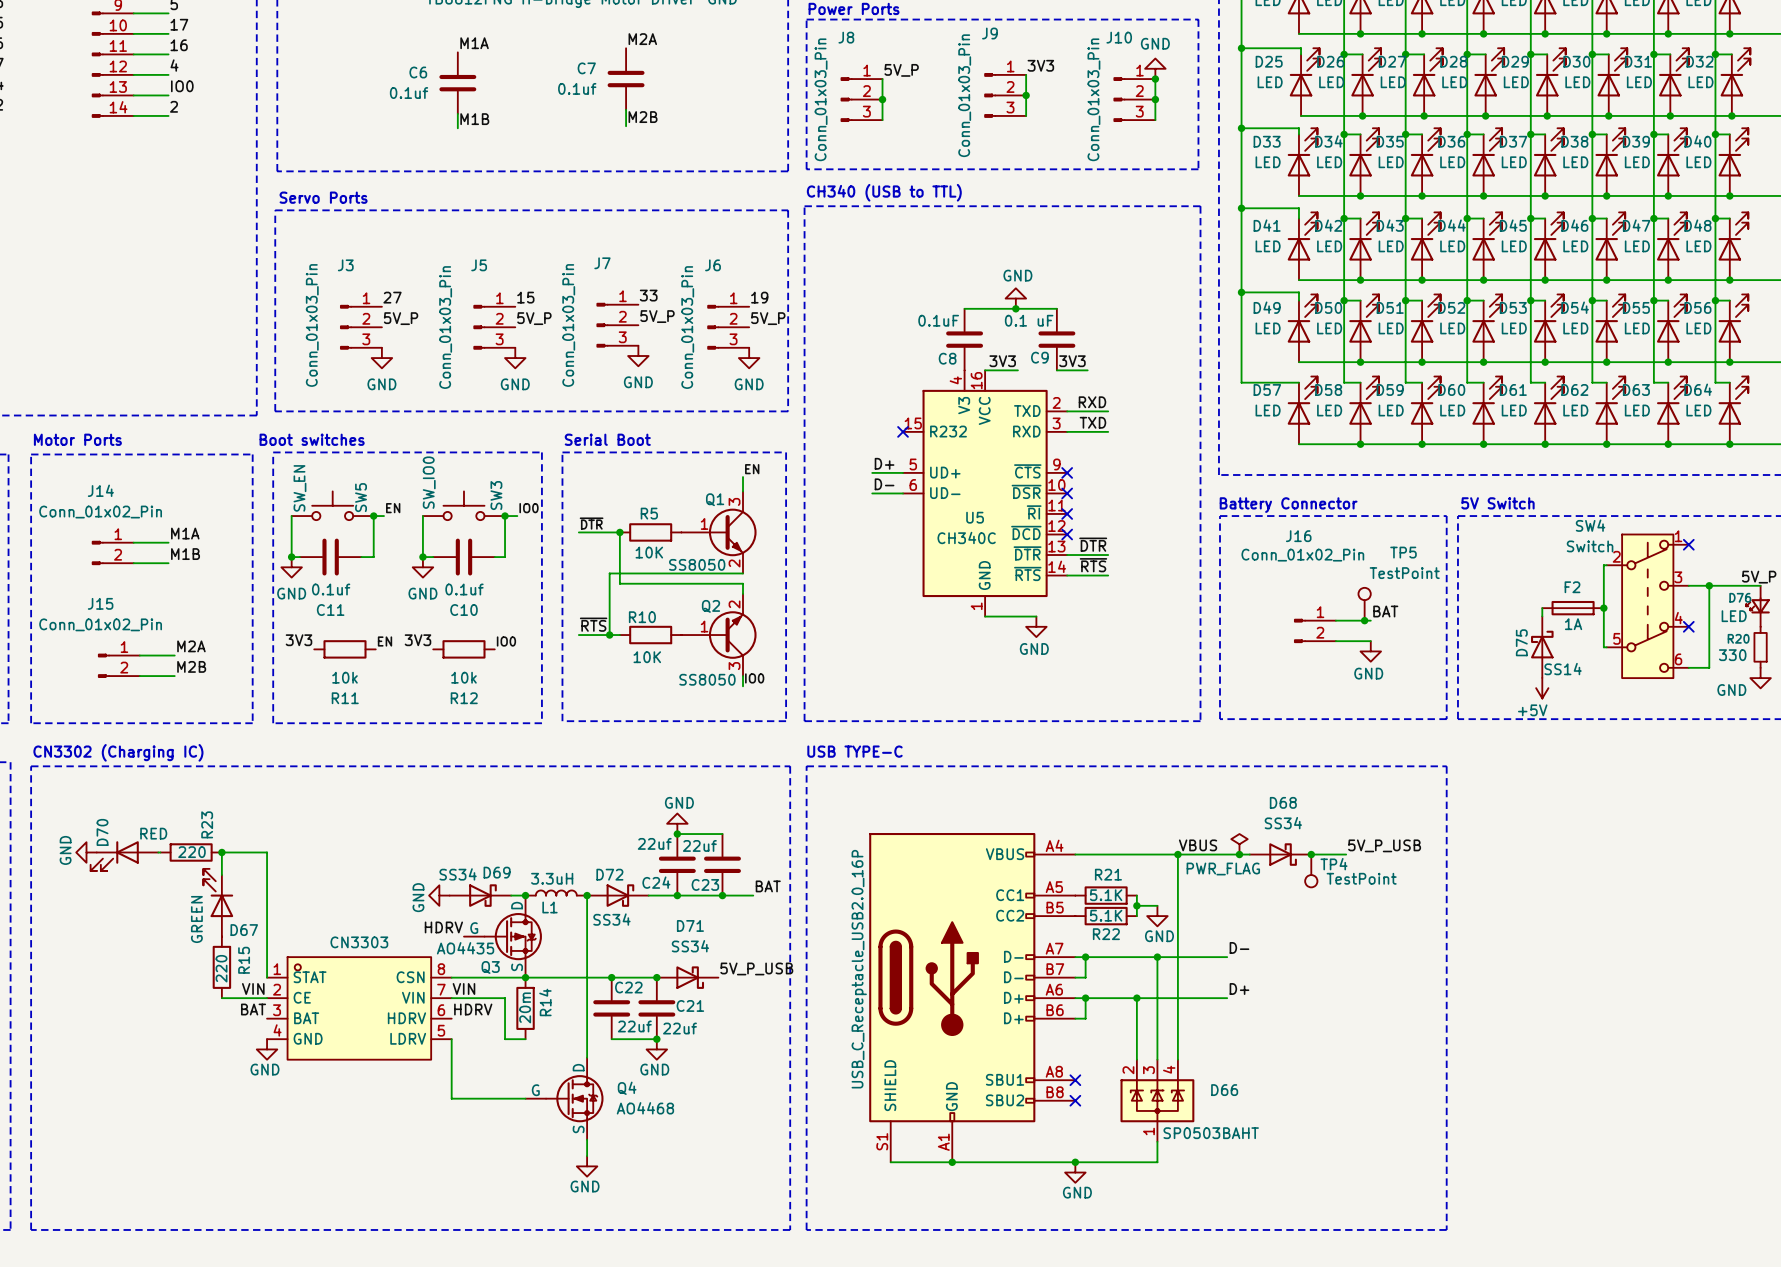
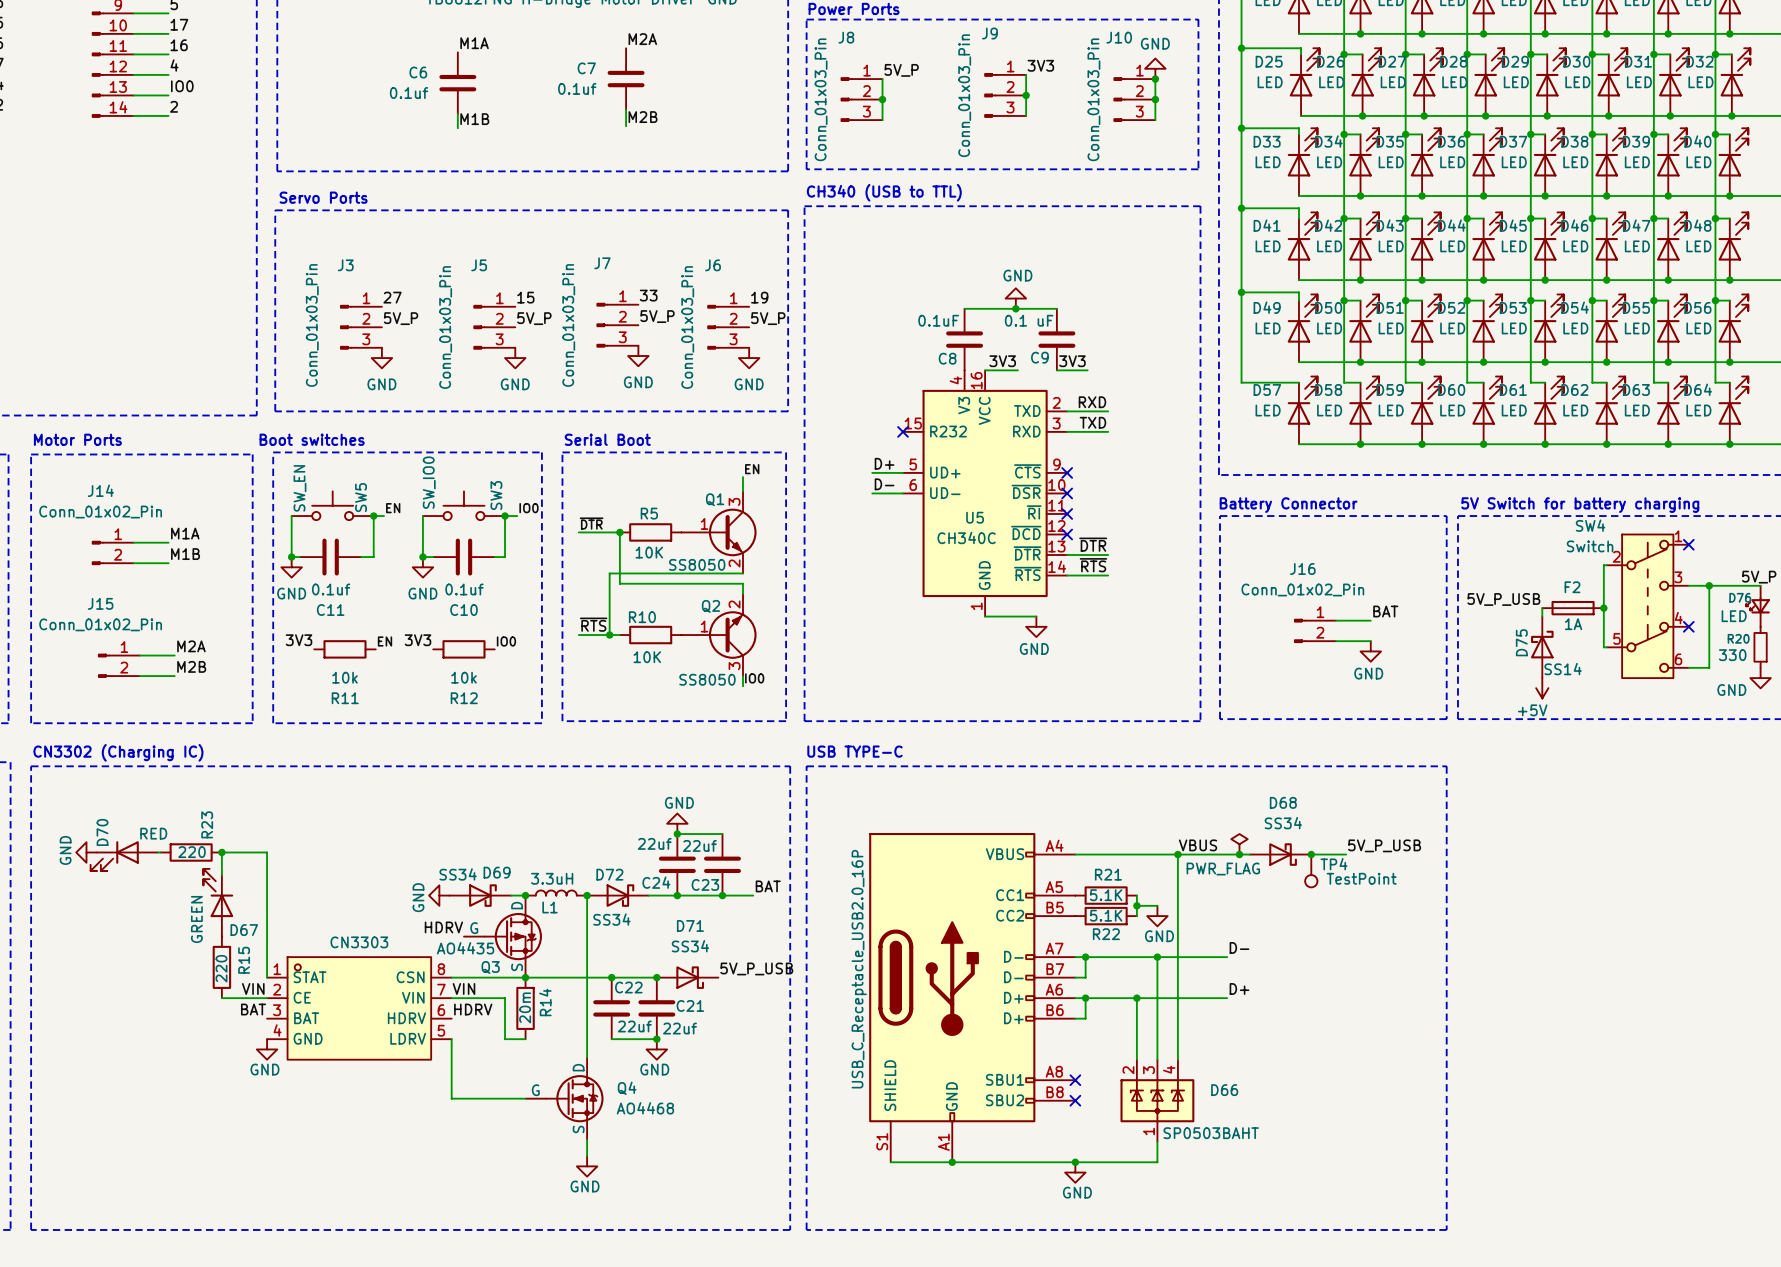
text: 5V Switch (1497, 503) -> 5V Switch for battery charging (1580, 505)
J16 name position: J16 (1298, 536) -> J16 (1302, 568)
J16 value position: Conn_01x02_Pin (1302, 555) -> Conn_01x02_Pin (1302, 589)
label: none -> 5V_P_USB (1503, 599)
TP5: TestPoint (1364, 604) -> none
junction: (1364, 620) -> none

